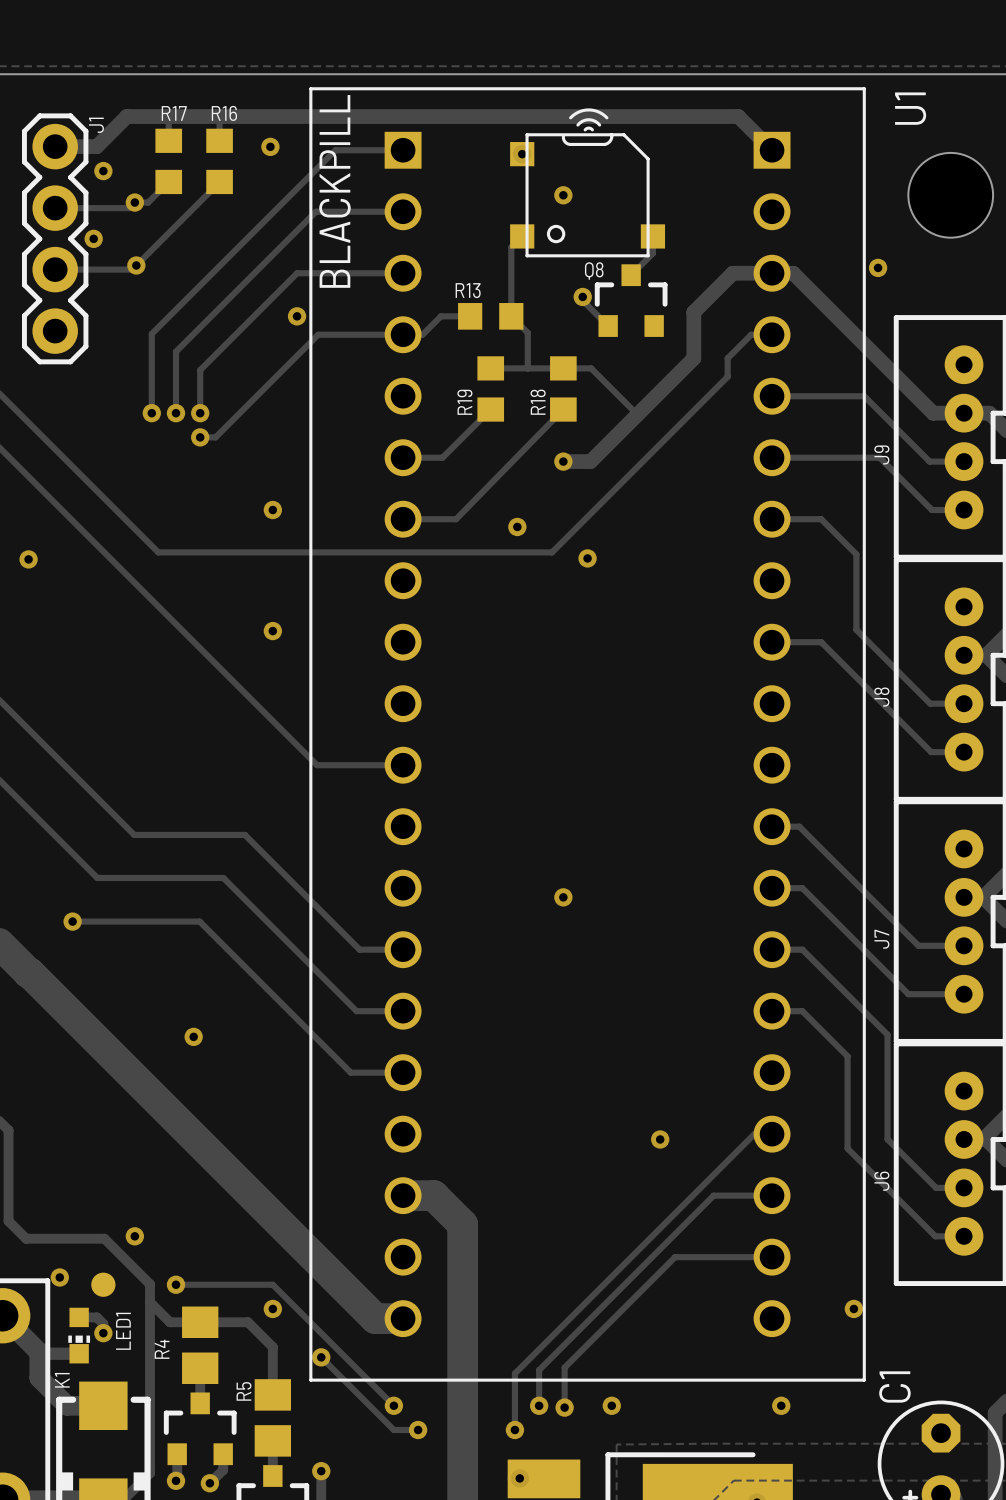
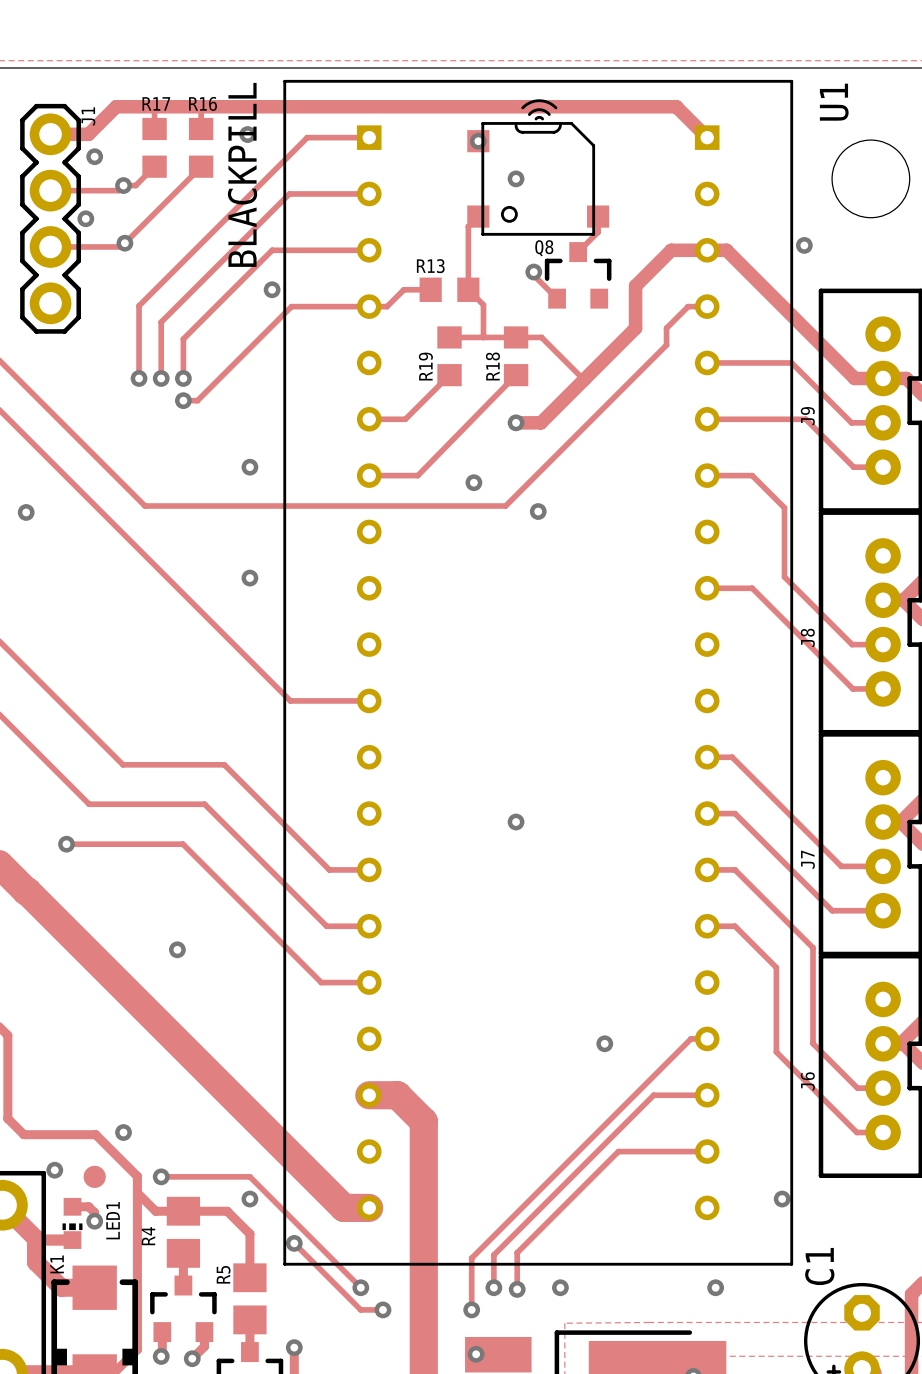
U1 footprint: [309, 87, 866, 1382] -> [283, 79, 794, 1266]
U1 value position: BLACKPILL (334, 191) -> BLACKPILL (242, 174)

